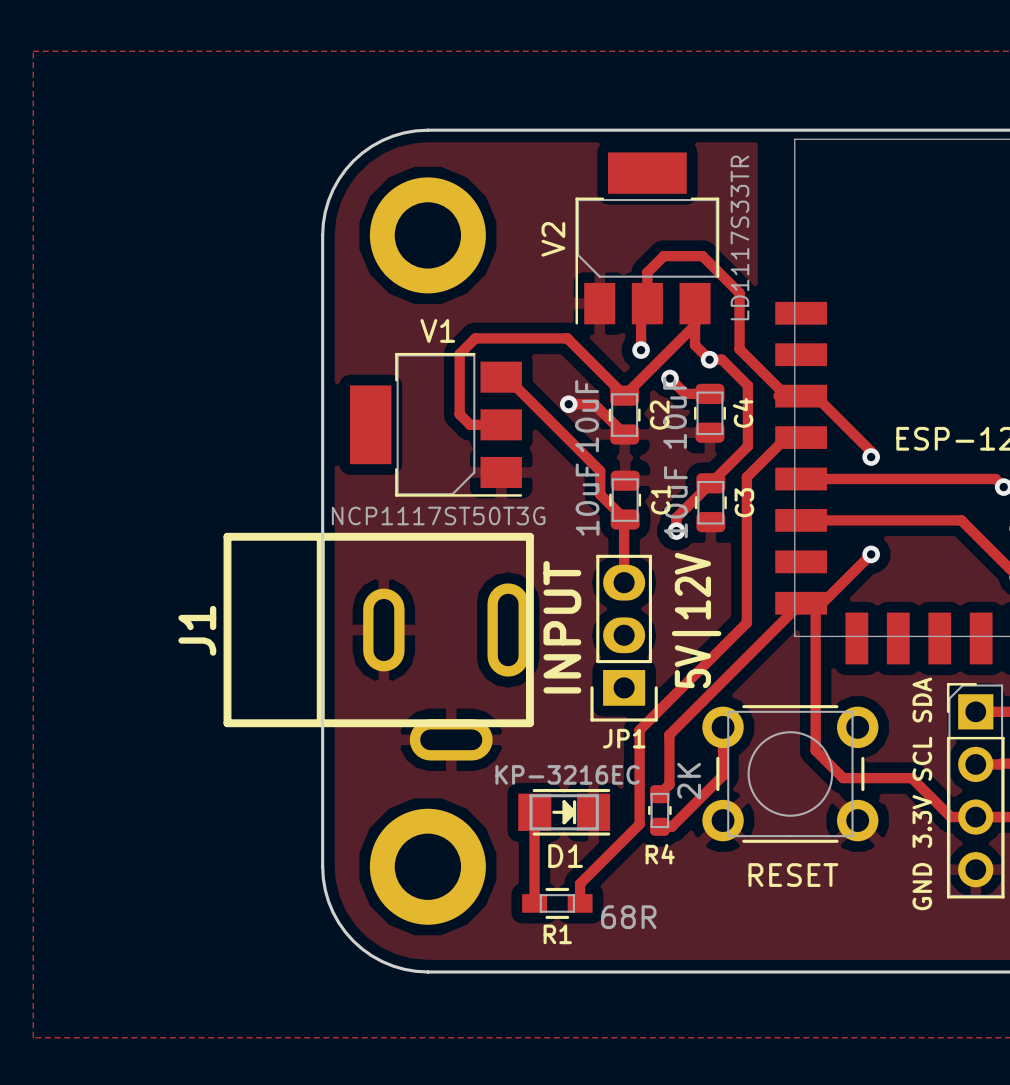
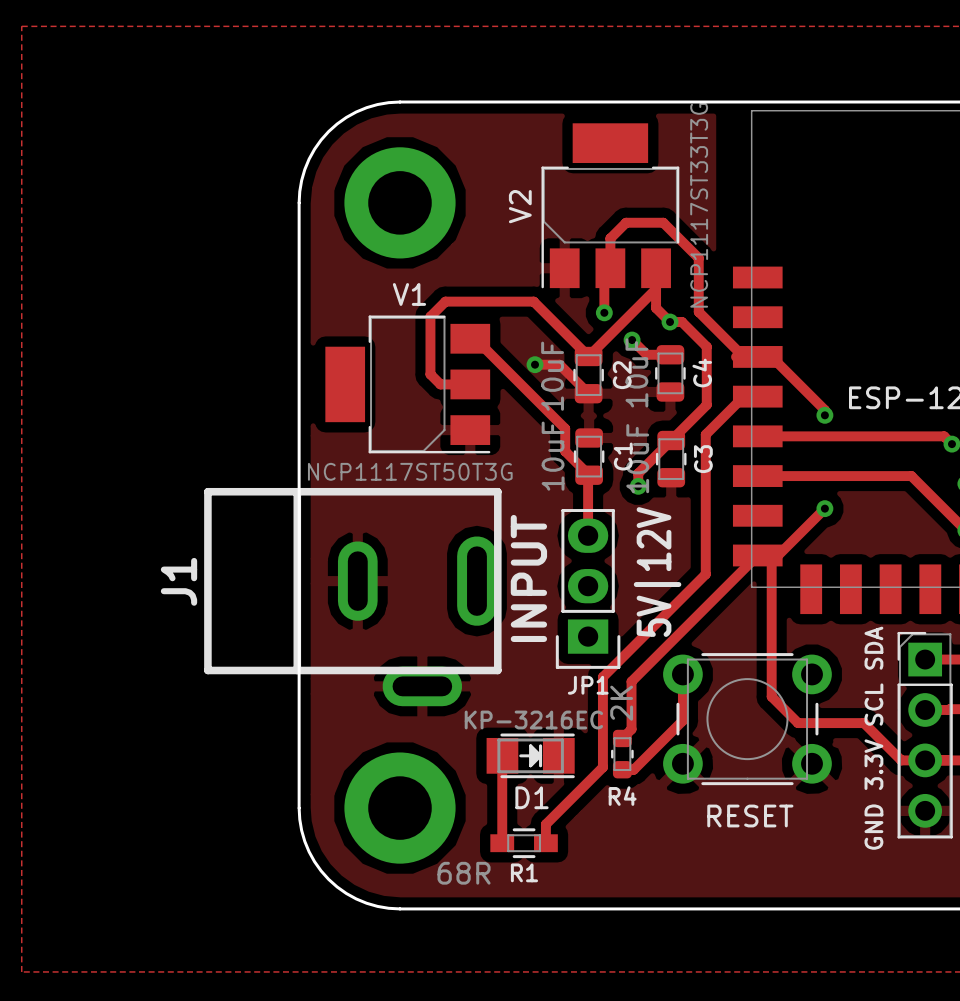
V2 value: LD1117S33TR (739, 237) -> NCP1117ST33T3G (699, 205)
R4 value position: 2K (689, 781) -> 2K (621, 703)
R1 value position: 68R (628, 917) -> 68R (464, 873)

